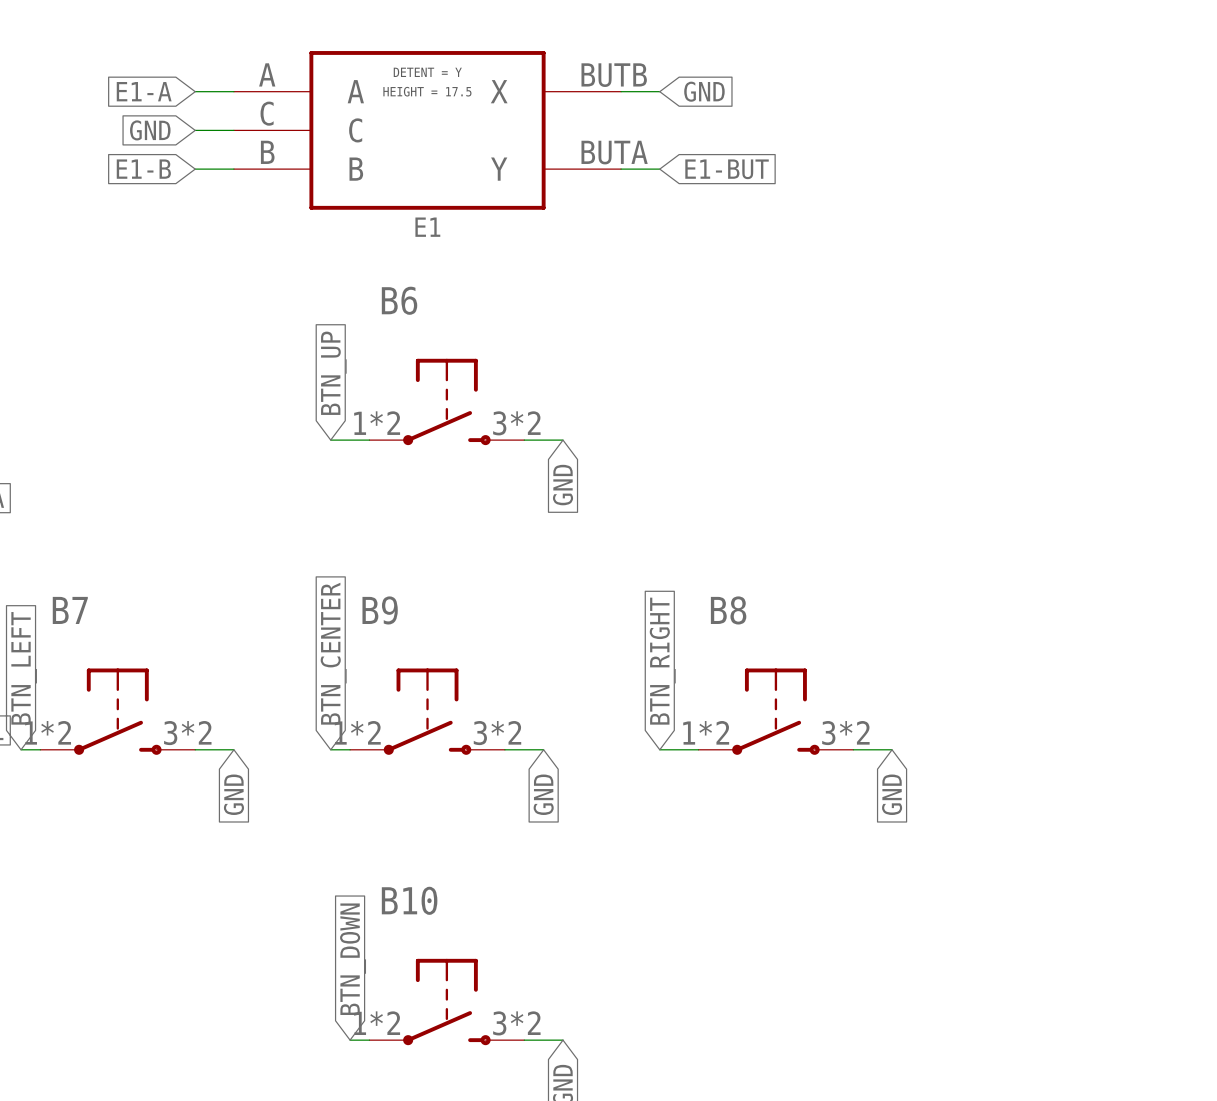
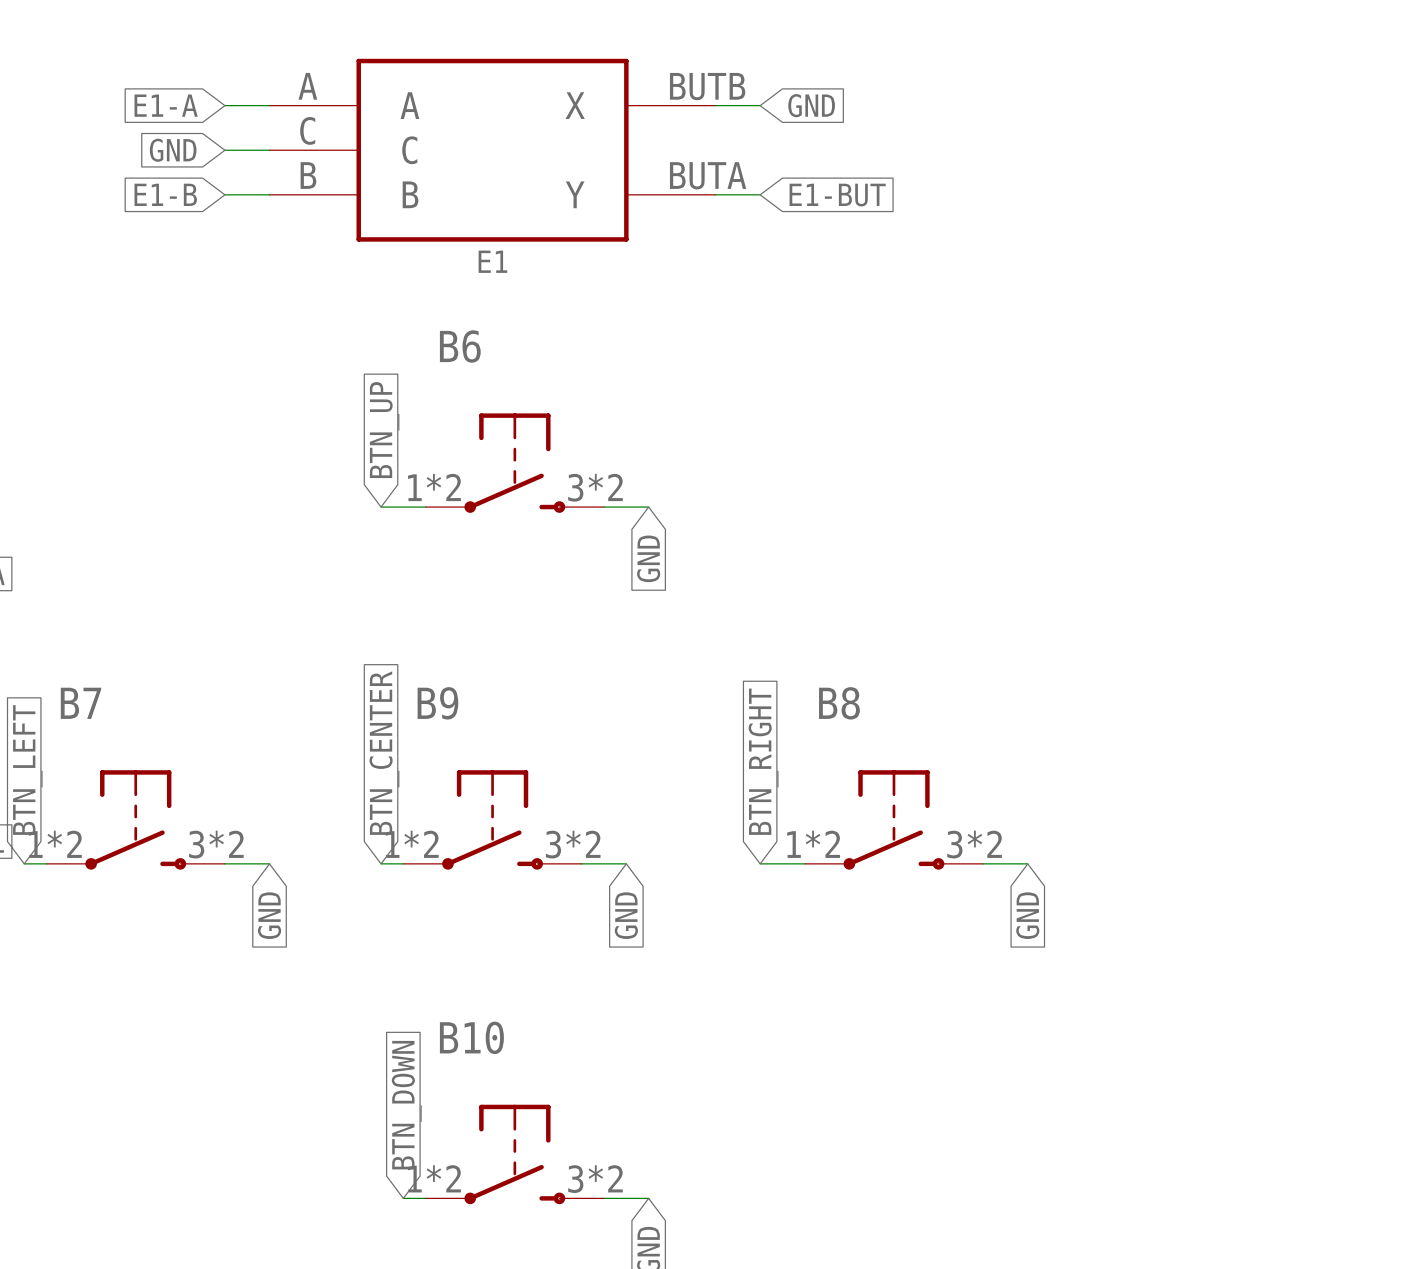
E1 text: DETENT = Y (427, 72) -> none
E1 text: HEIGHT = 17.5 (427, 91) -> none

